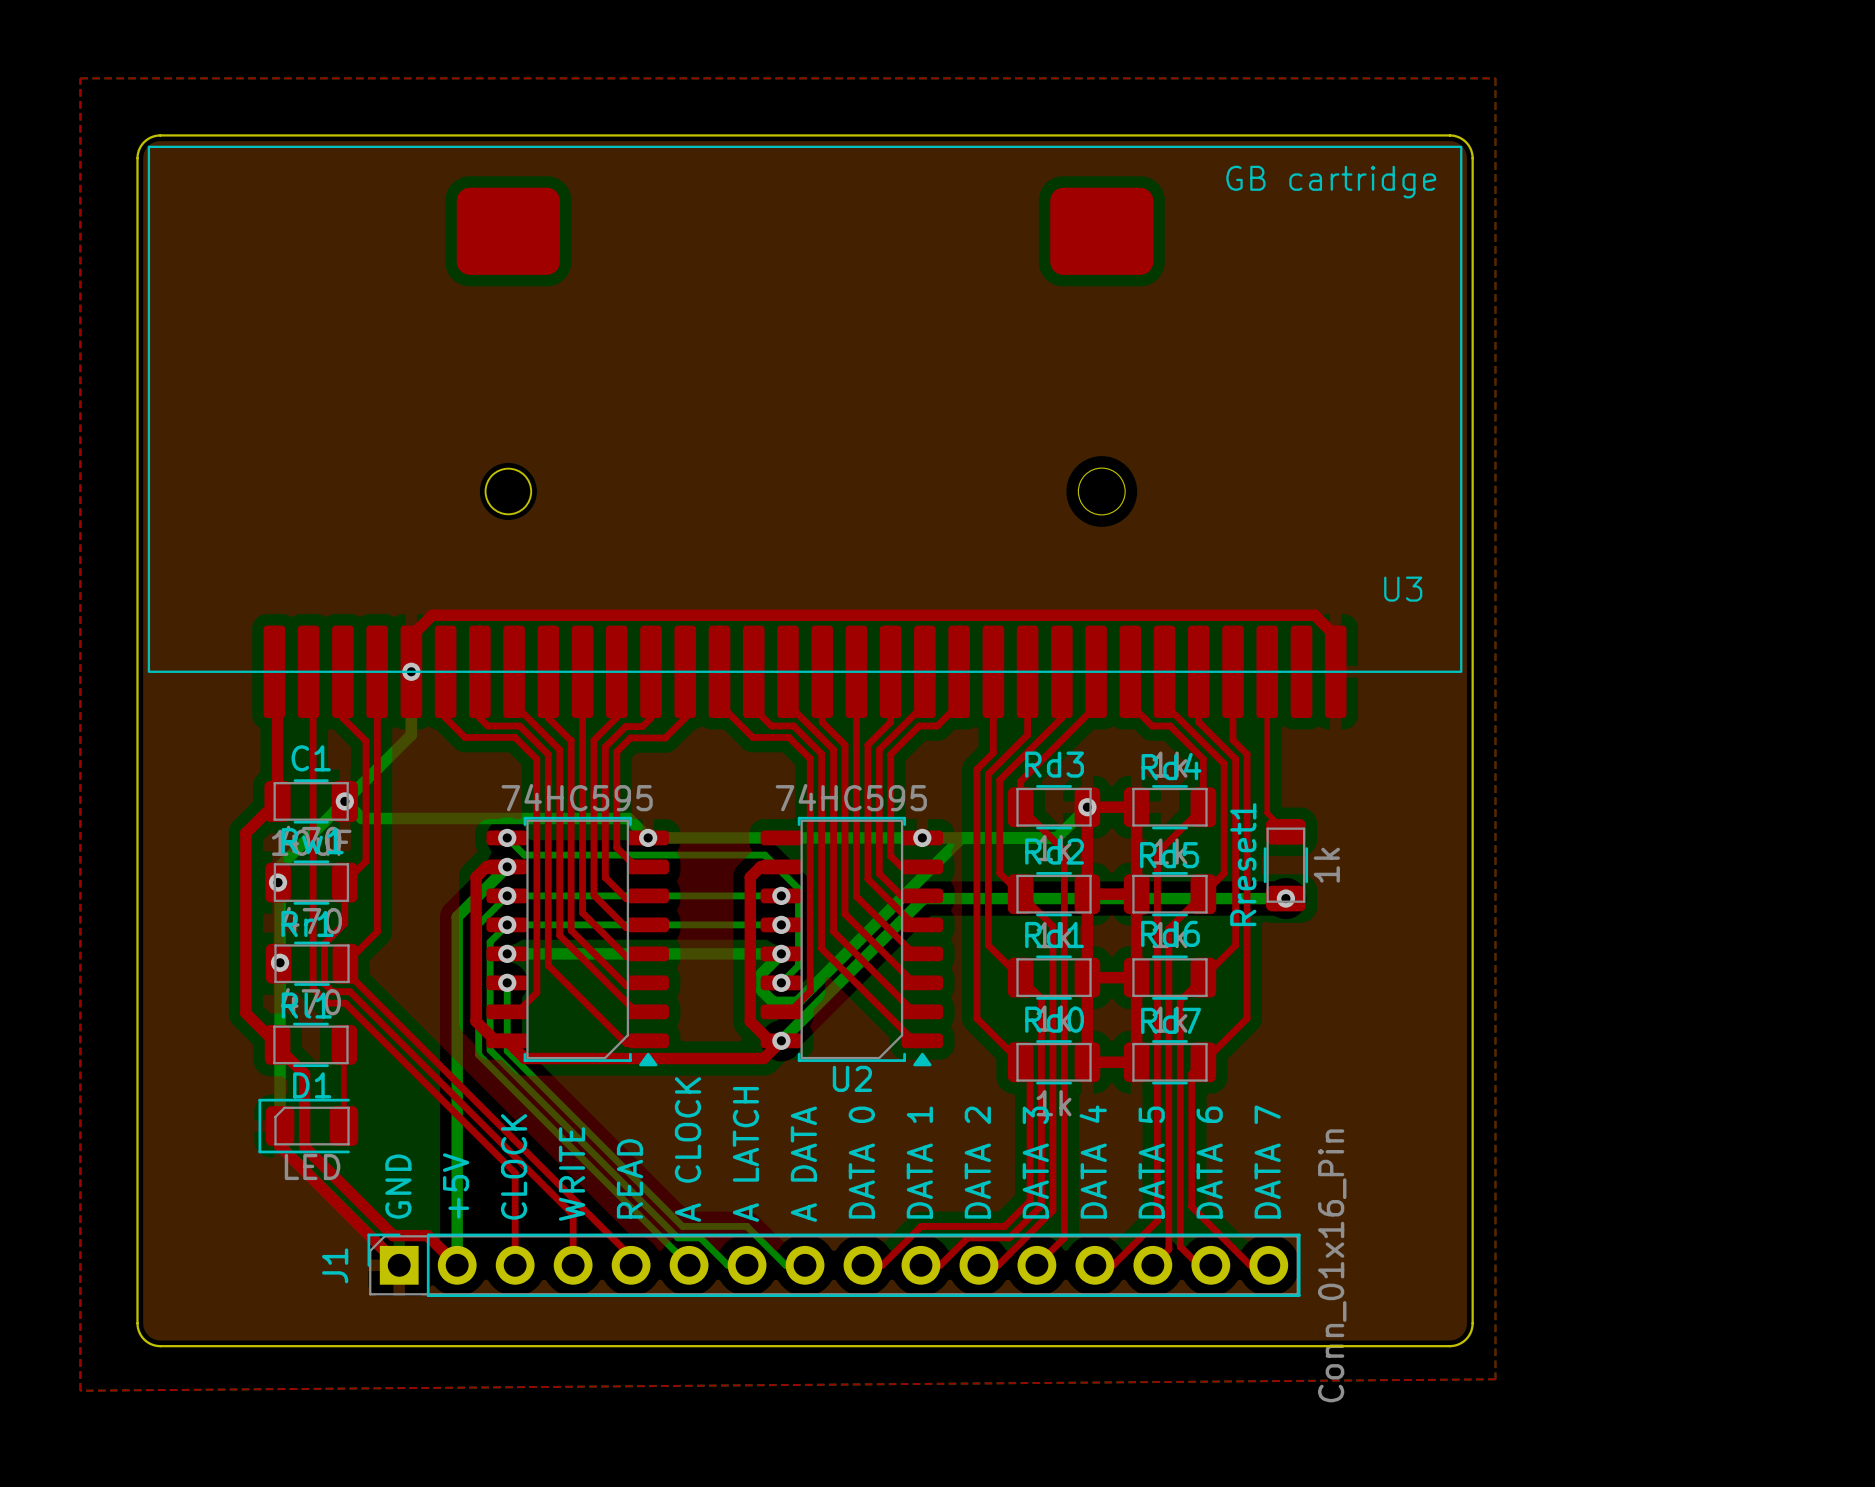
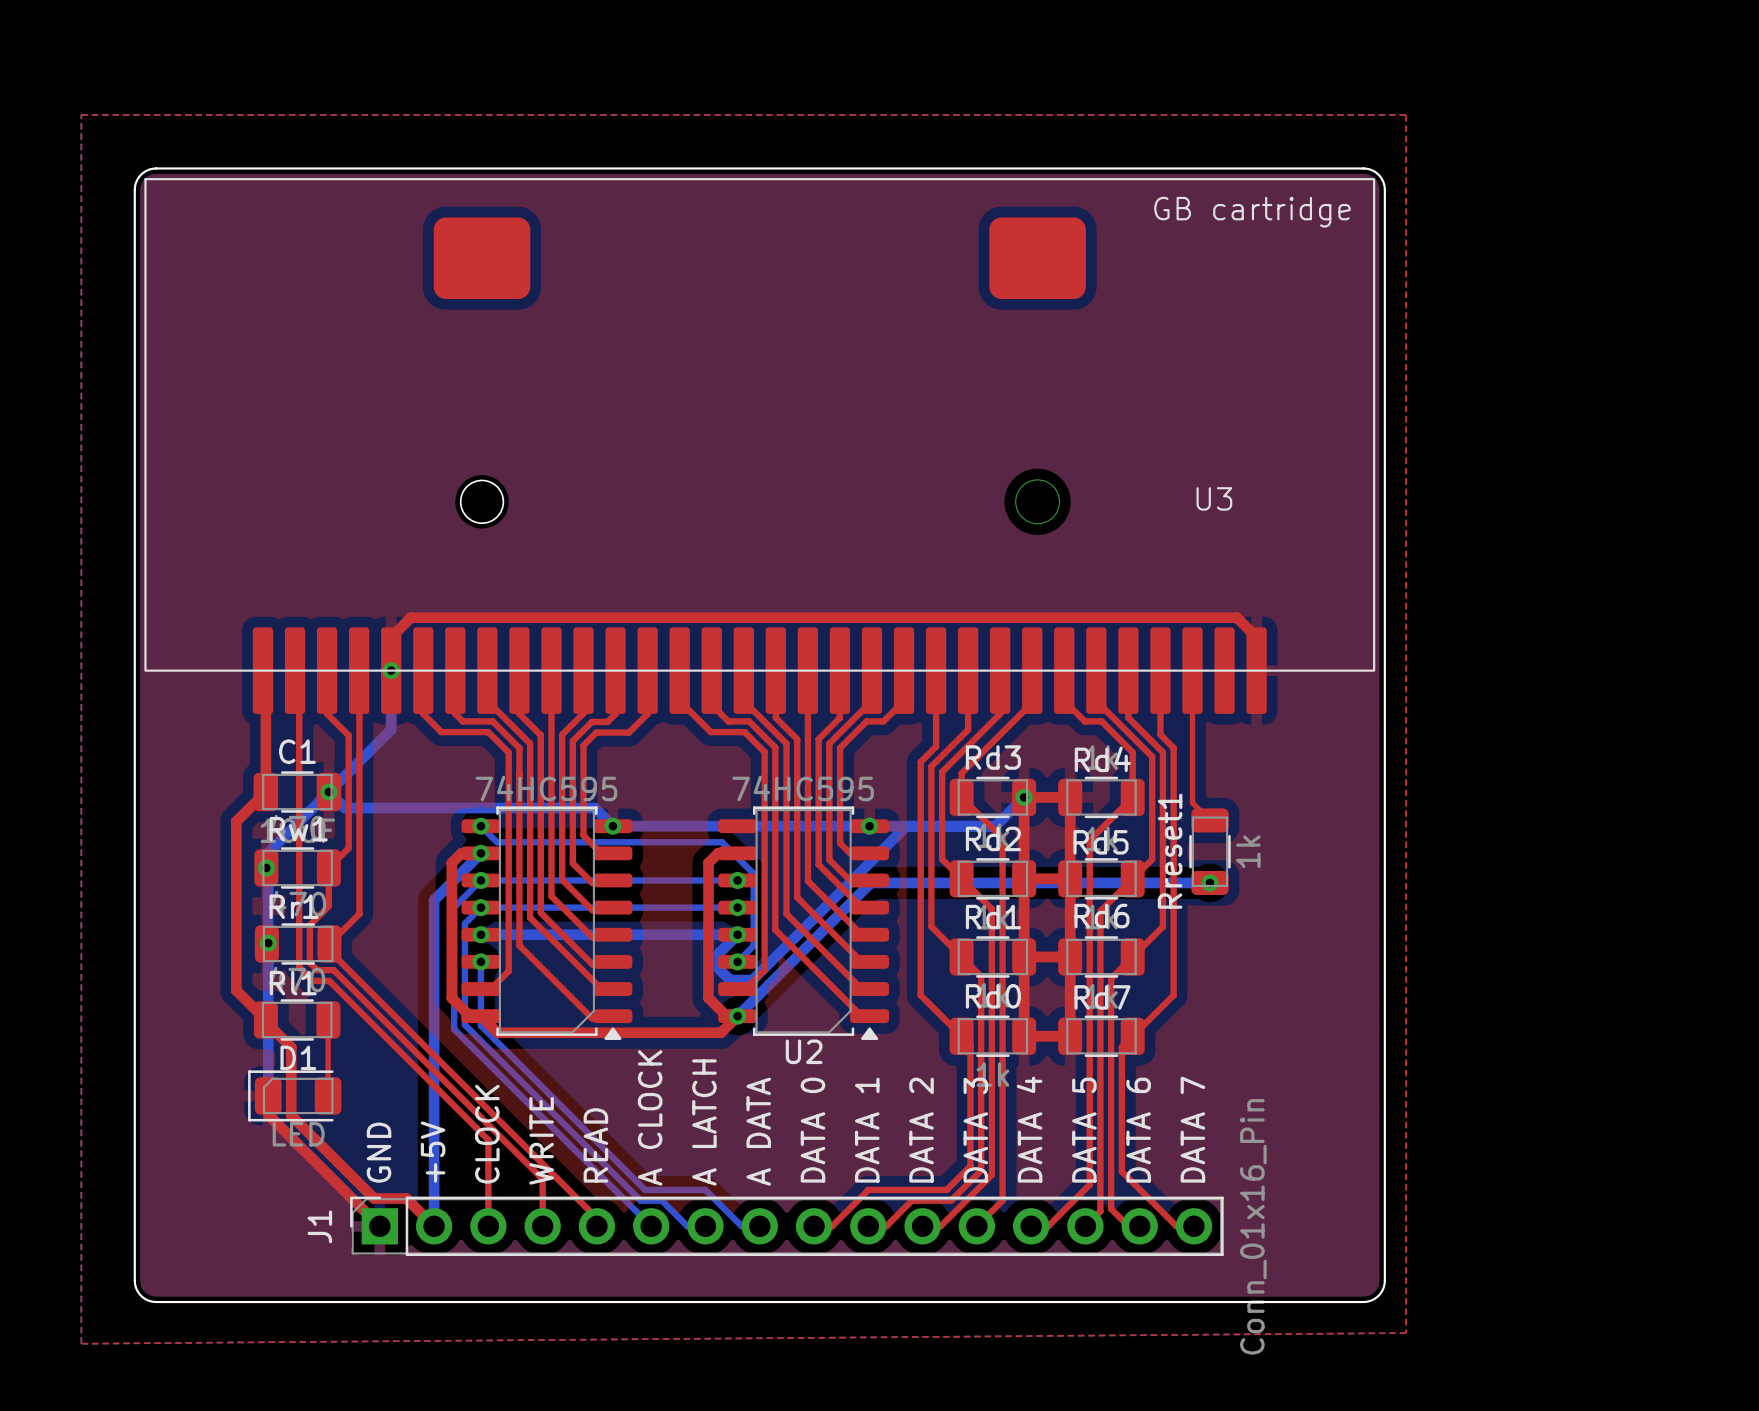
U3 name position: U3 (1403, 589) -> U3 (1214, 498)

